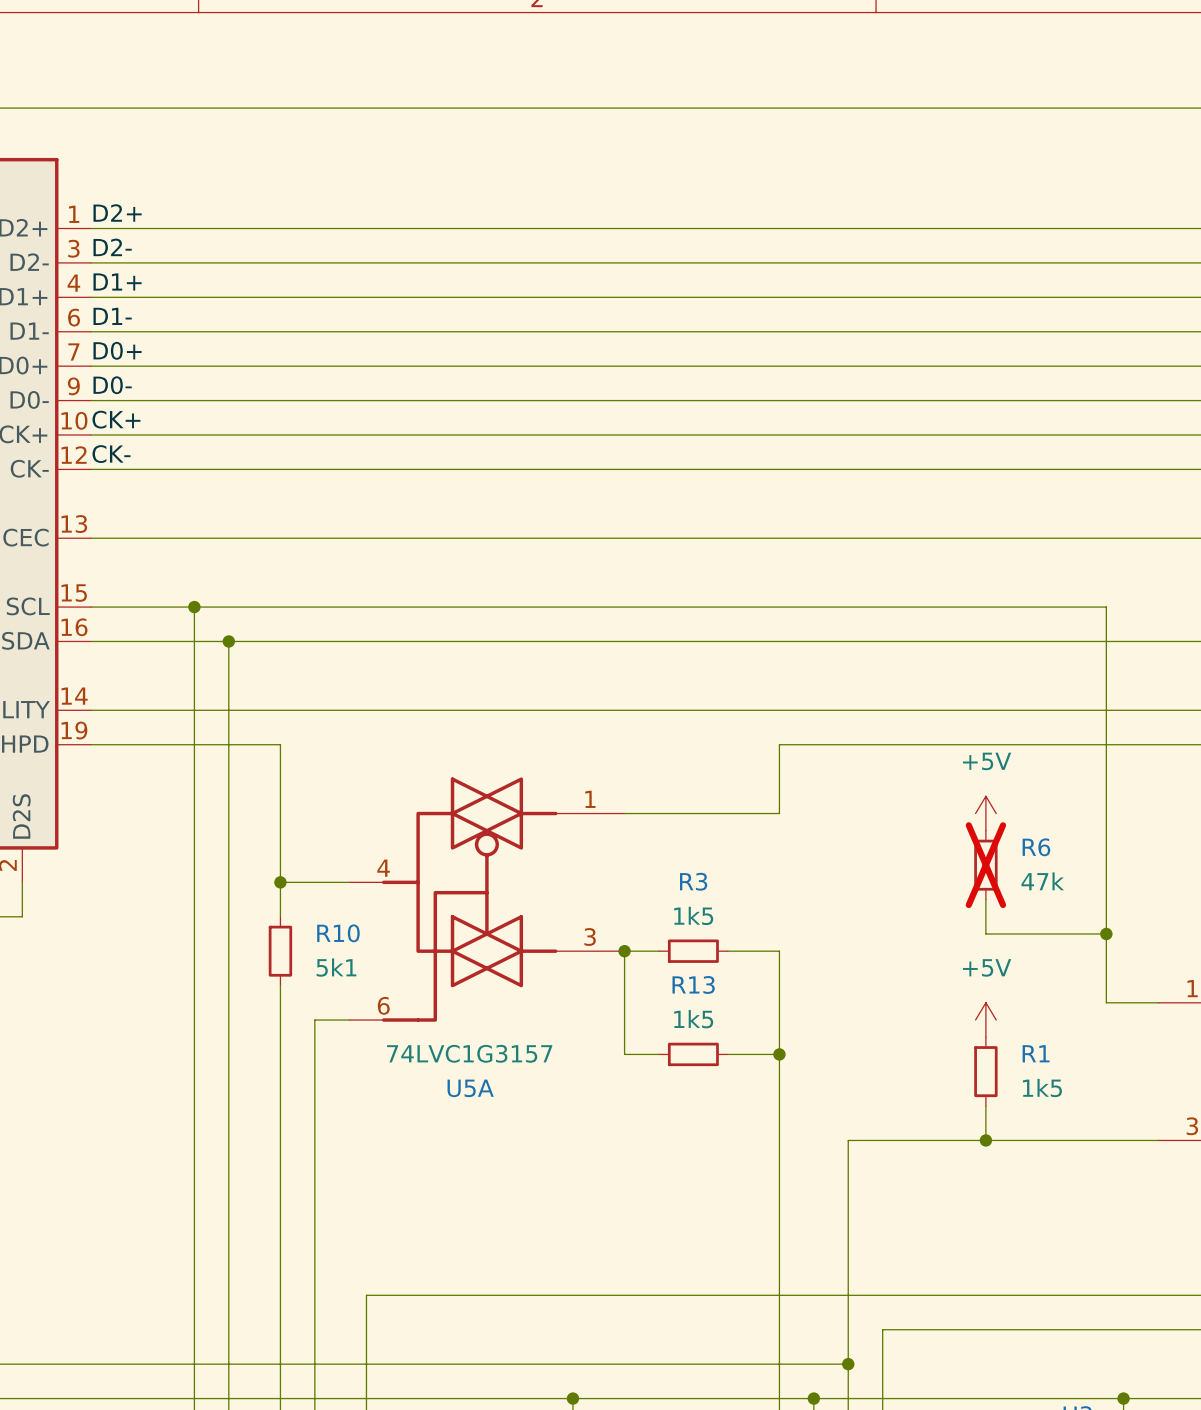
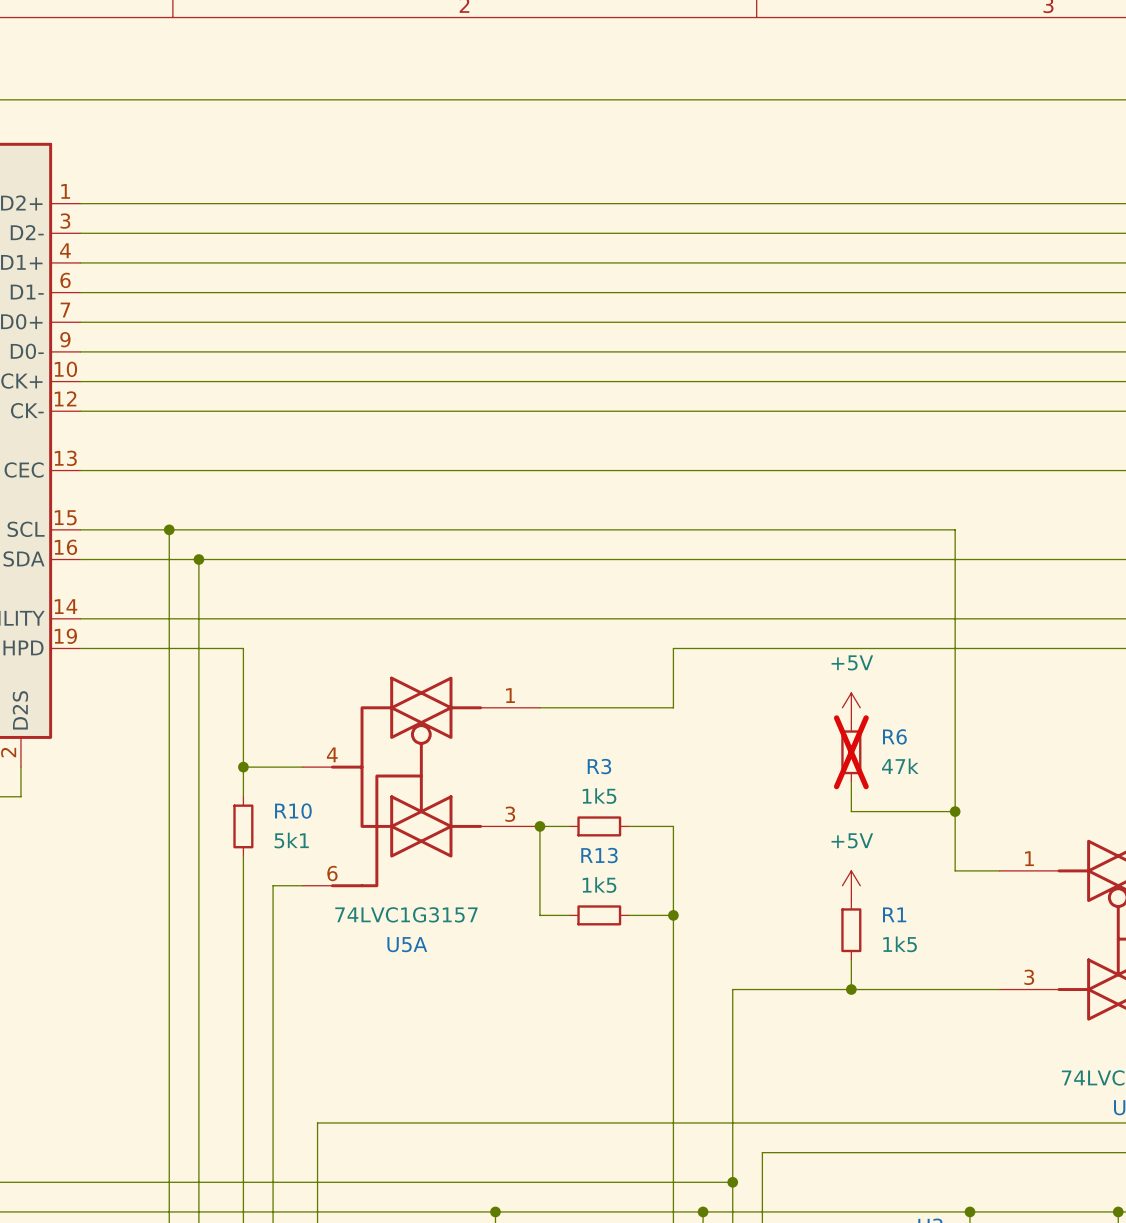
label: D2+ (117, 213) -> none
label: D2- (112, 247) -> none
label: D1+ (117, 281) -> none
label: D1- (112, 316) -> none
label: D0+ (117, 350) -> none
label: D0- (112, 385) -> none
label: CK+ (116, 419) -> none
label: CK- (111, 454) -> none

